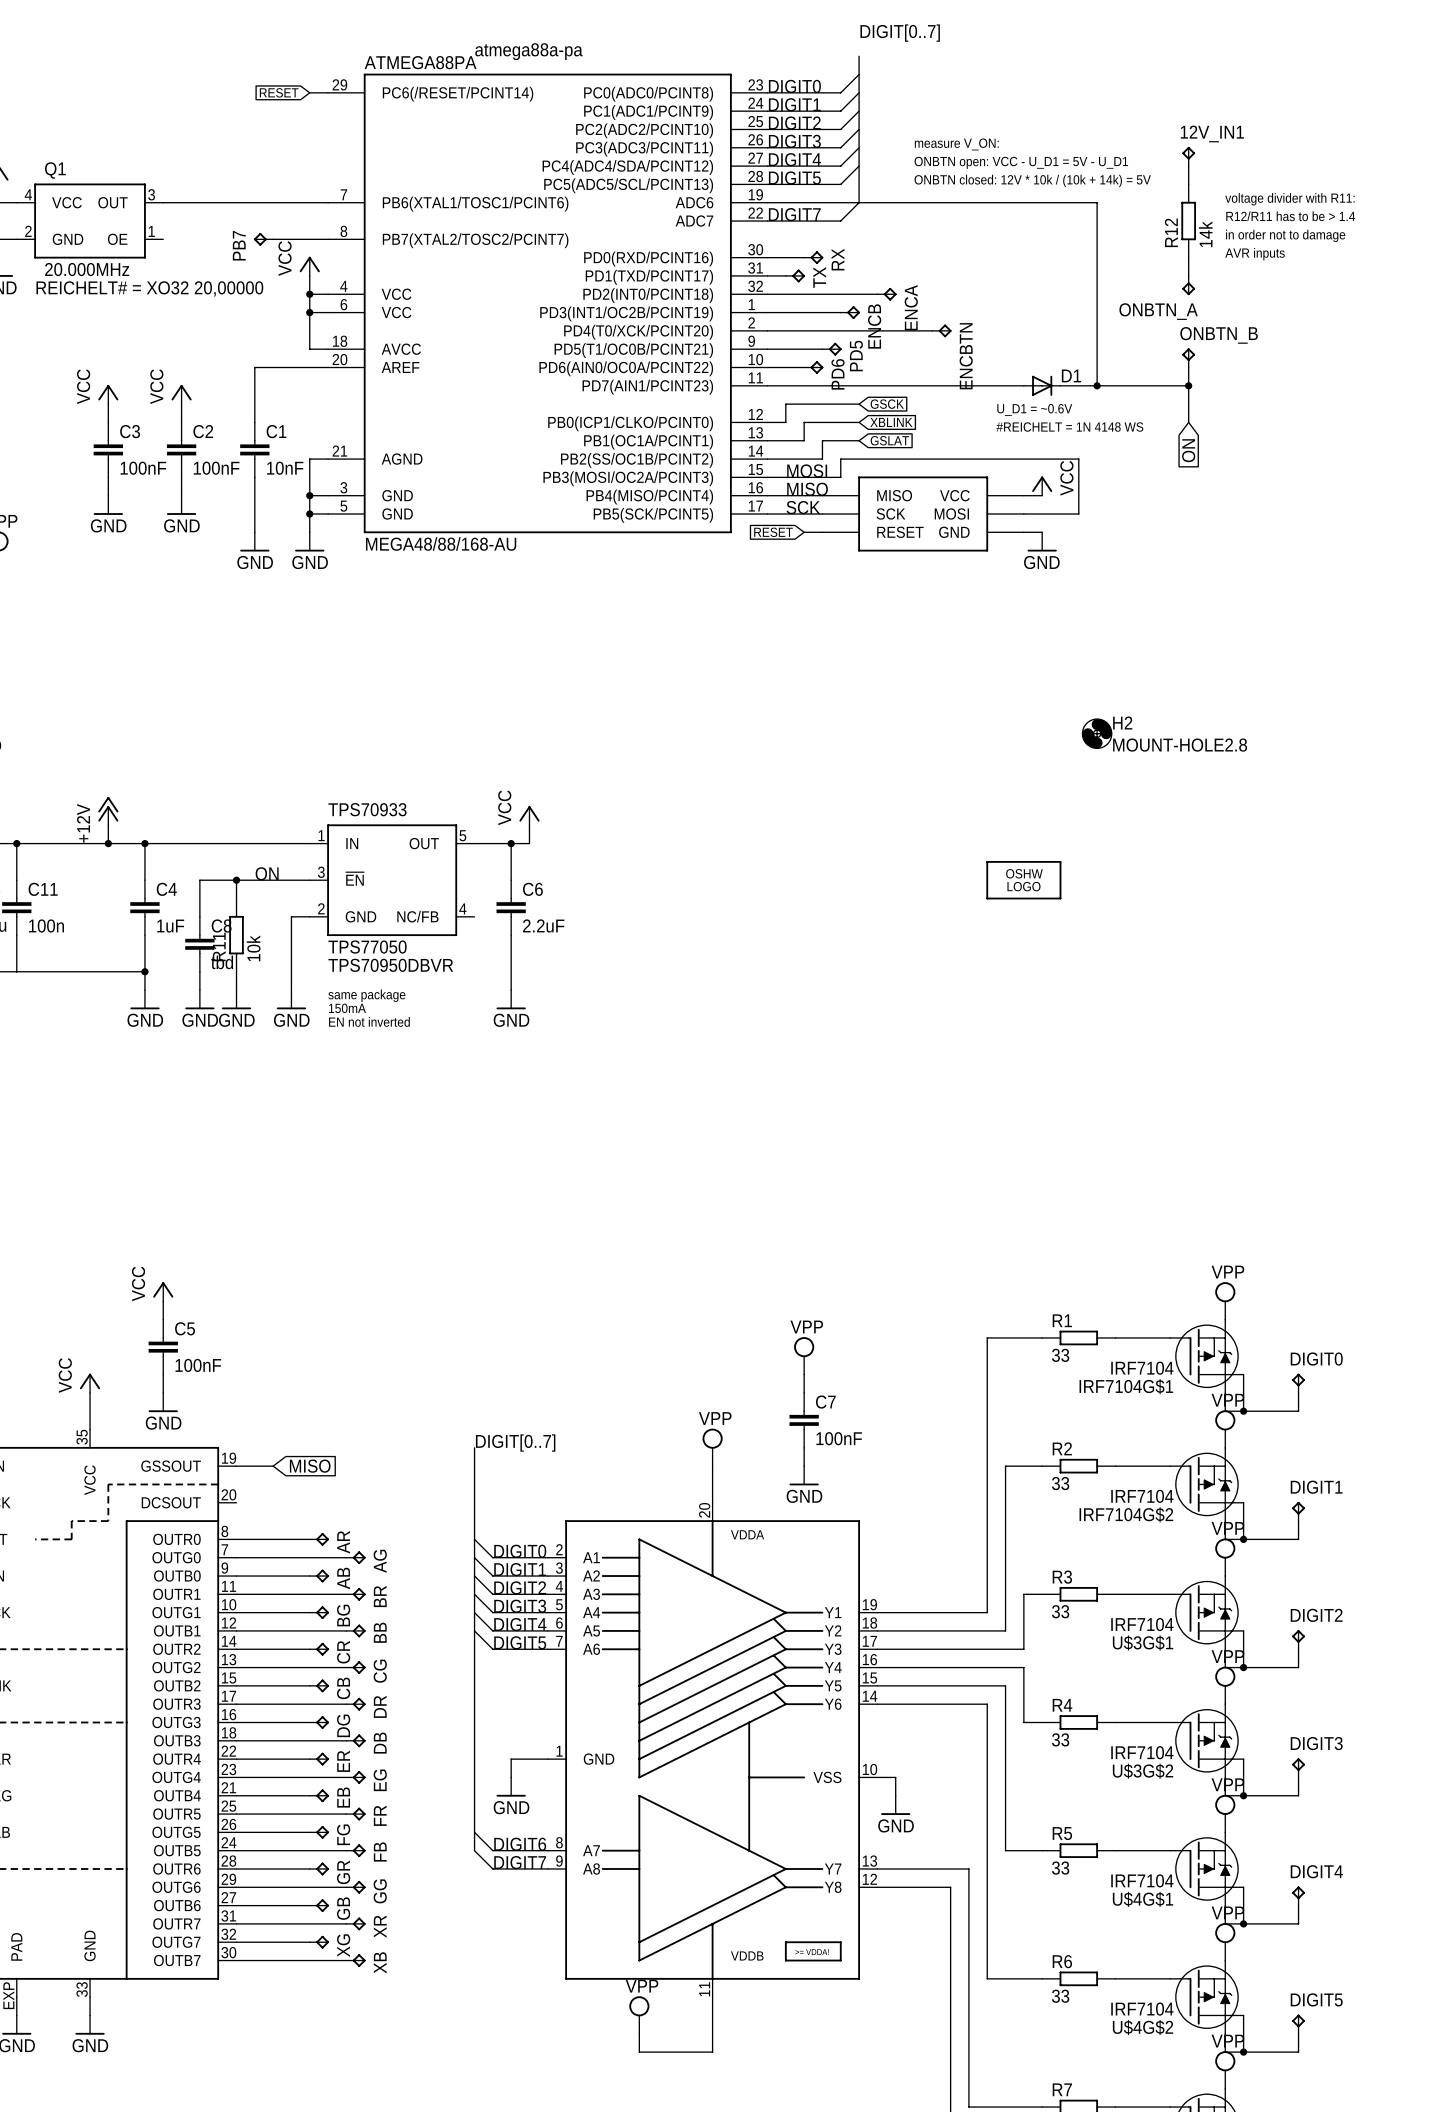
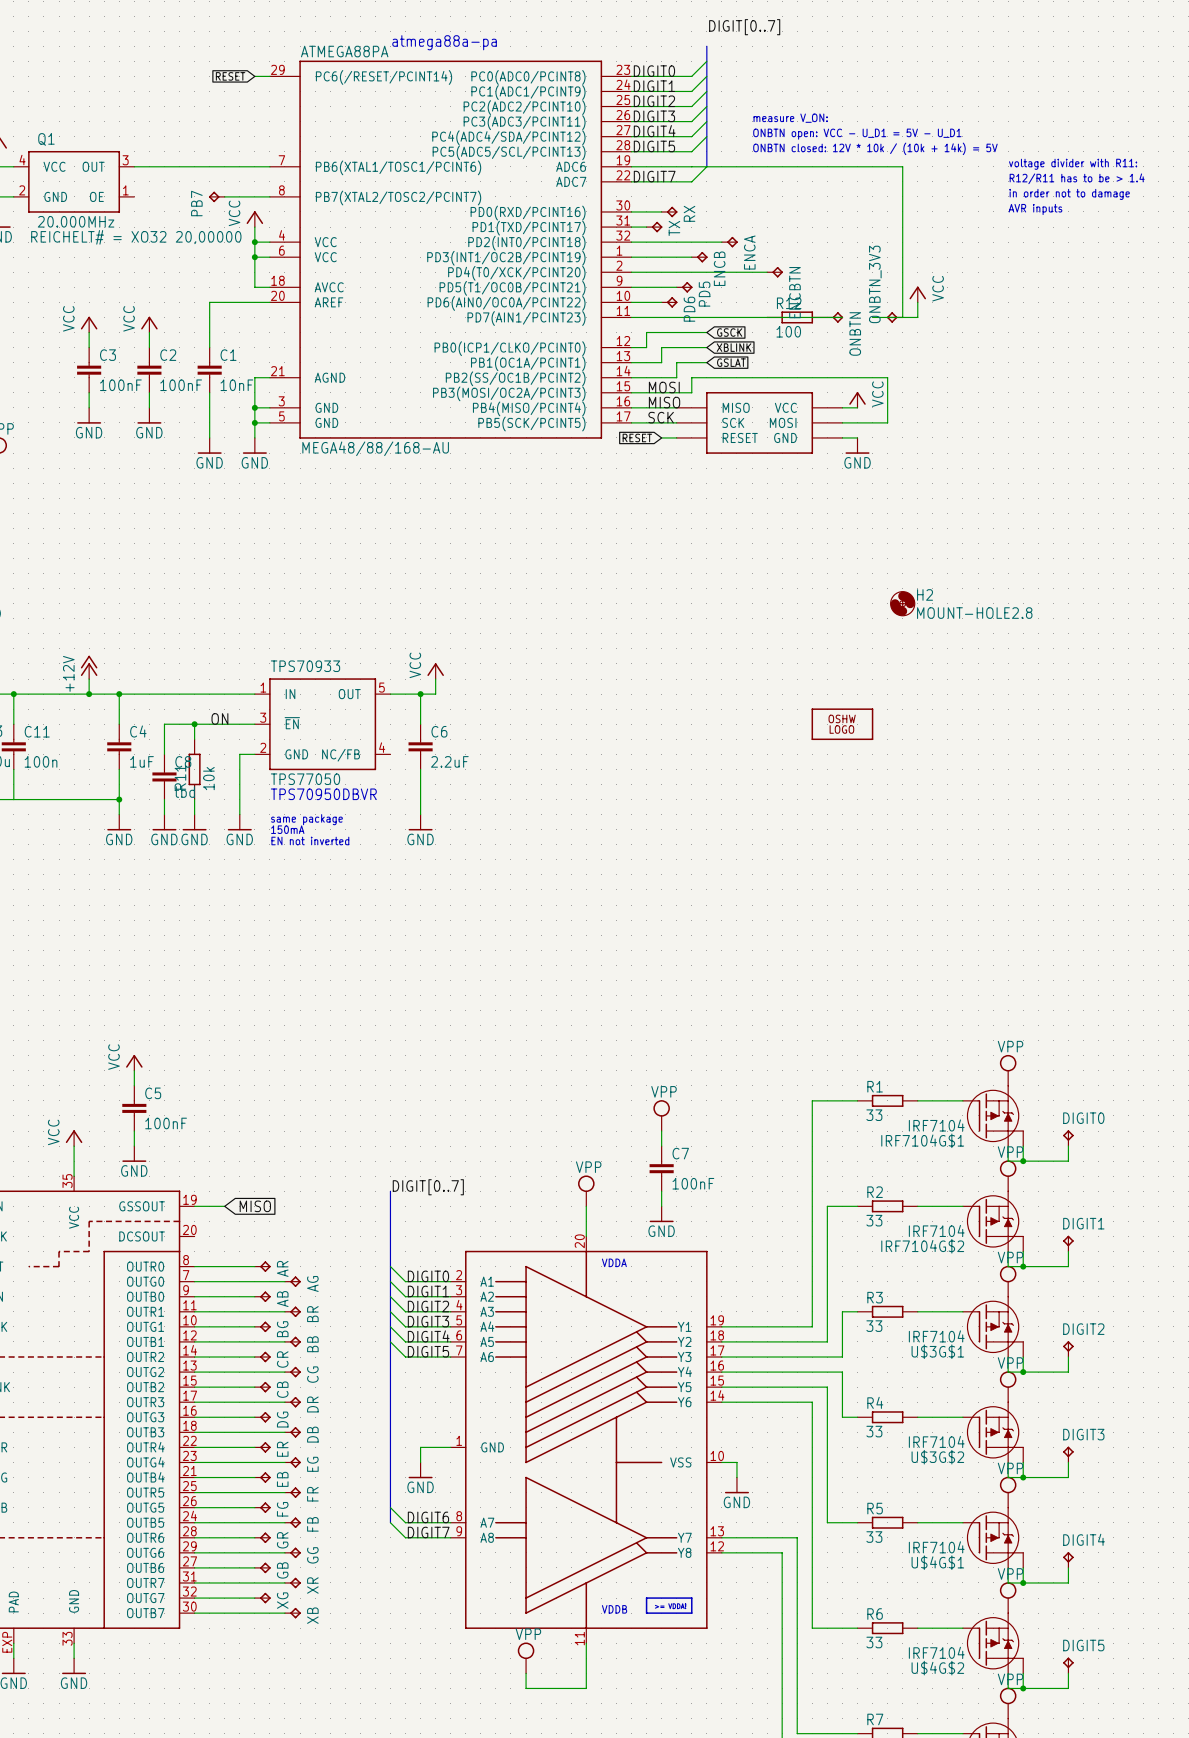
12V_IN1: (1188, 156) -> none
wire: (1188, 166) (1188, 184) -> none
R12 rotation: 0° (1188, 221) -> 90° clockwise (797, 317)
R12 position: (1188, 221) -> (797, 317)
R12 value: 14k (1205, 234) -> 100 (788, 331)
wire: (1188, 257) (1188, 275) -> none
ONBTN_A: (1188, 285) -> none
power symbol: none -> VCC (917, 294)
ONBTN_B: (1188, 357) -> none
wire: (1188, 367) (1188, 422) -> none
ONBTN: none -> (835, 317)
D1: (1042, 385) -> none
ONBTN_3V3: none -> (894, 317)
junction: (1097, 385) -> none
wire: (1115, 385) (1188, 385) -> (917, 317) (917, 302)
junction: (1188, 385) -> none
global label: ON (1188, 450) -> none

